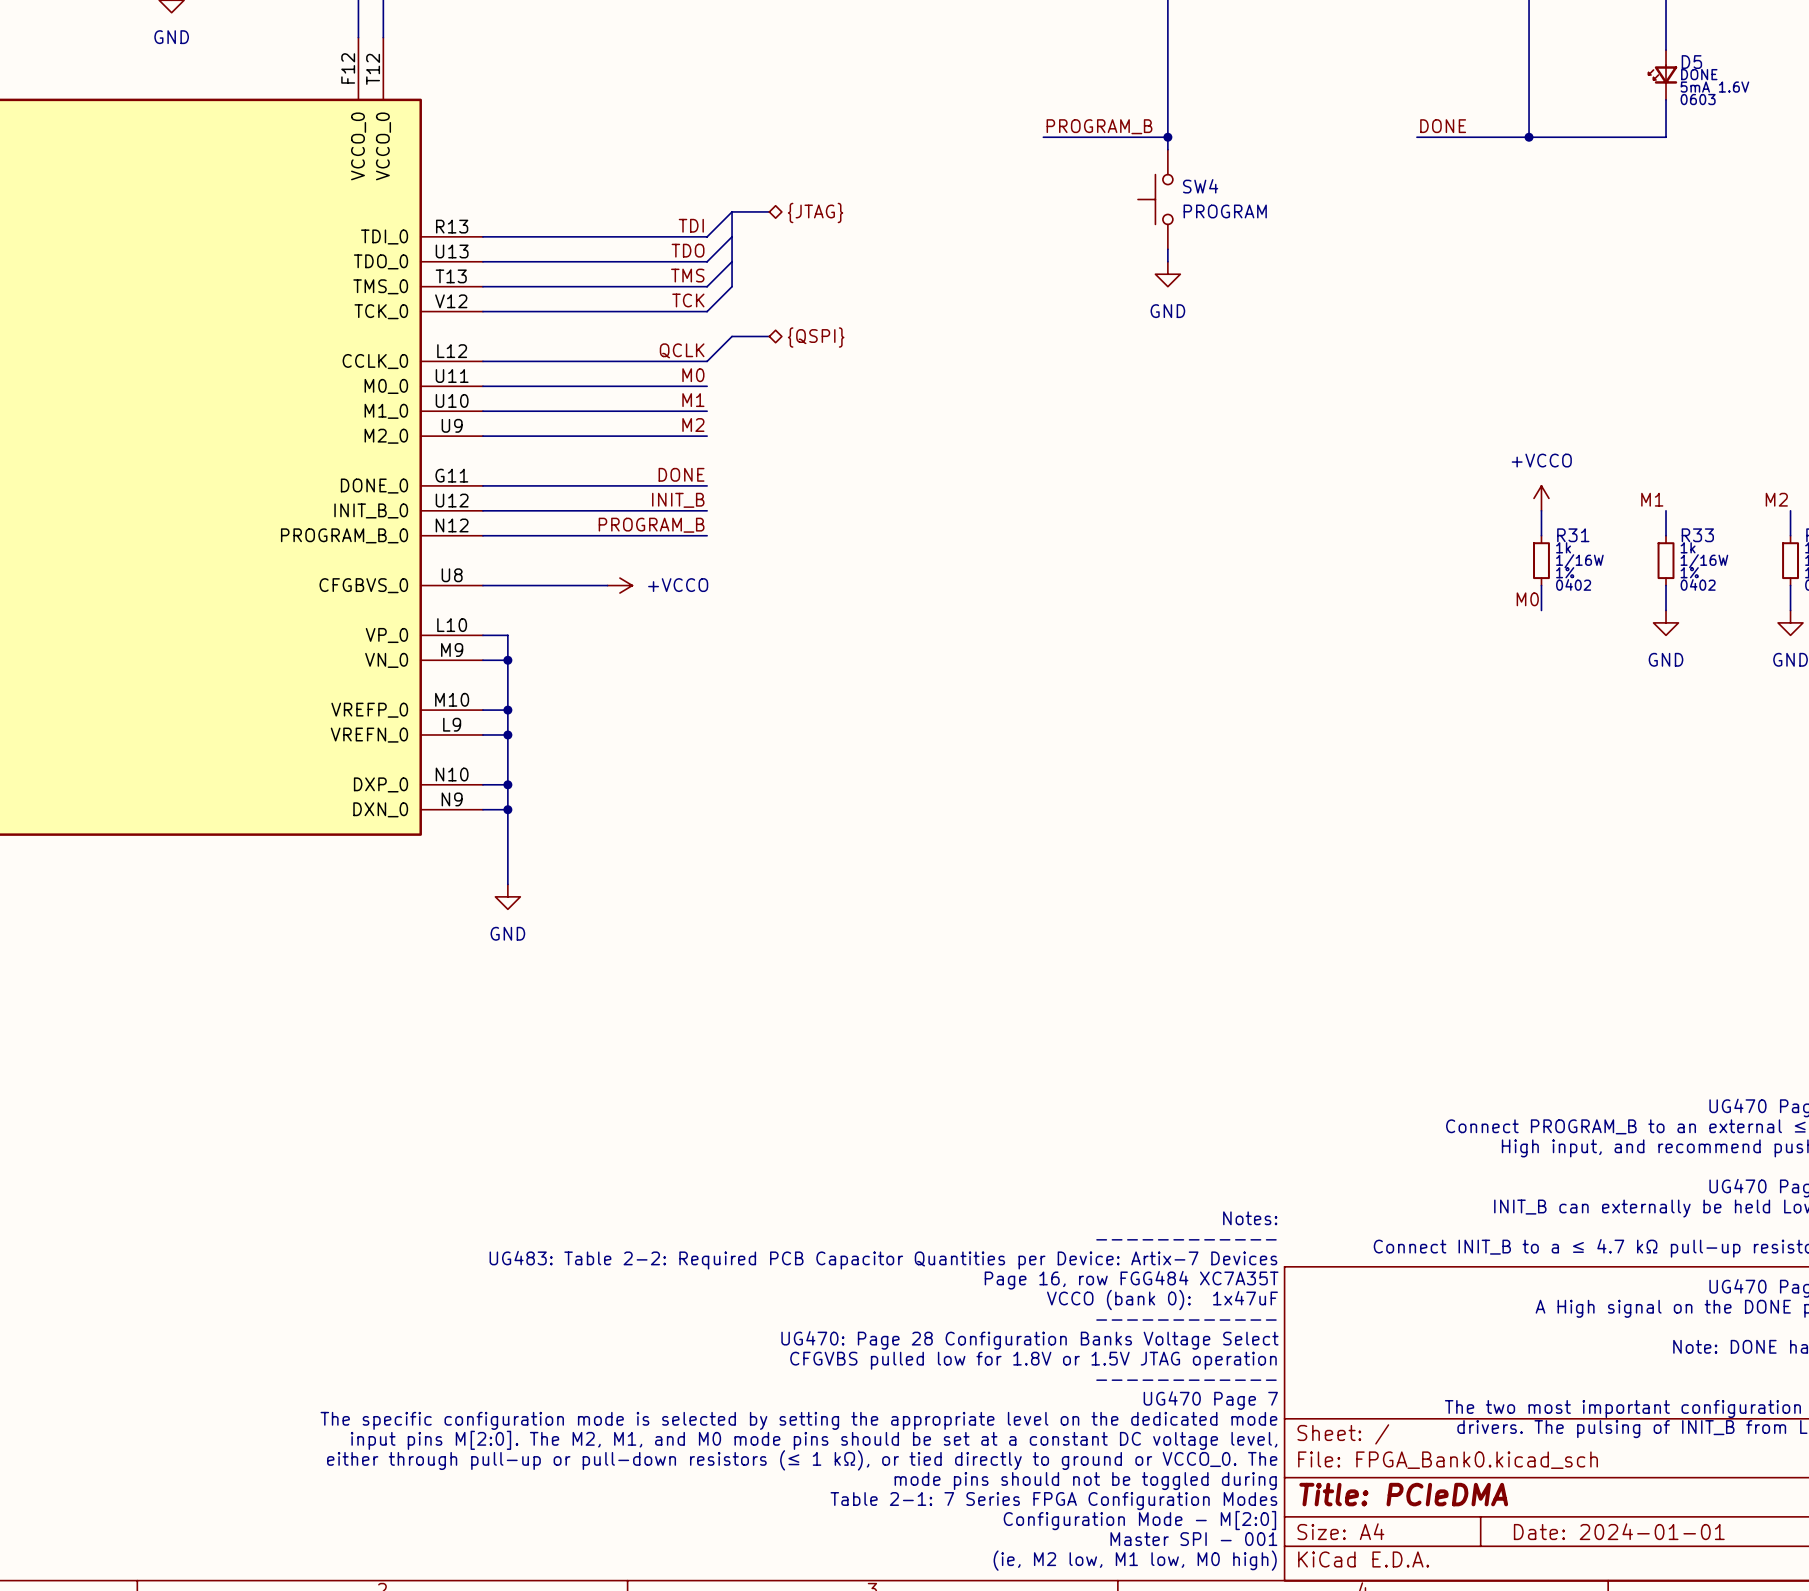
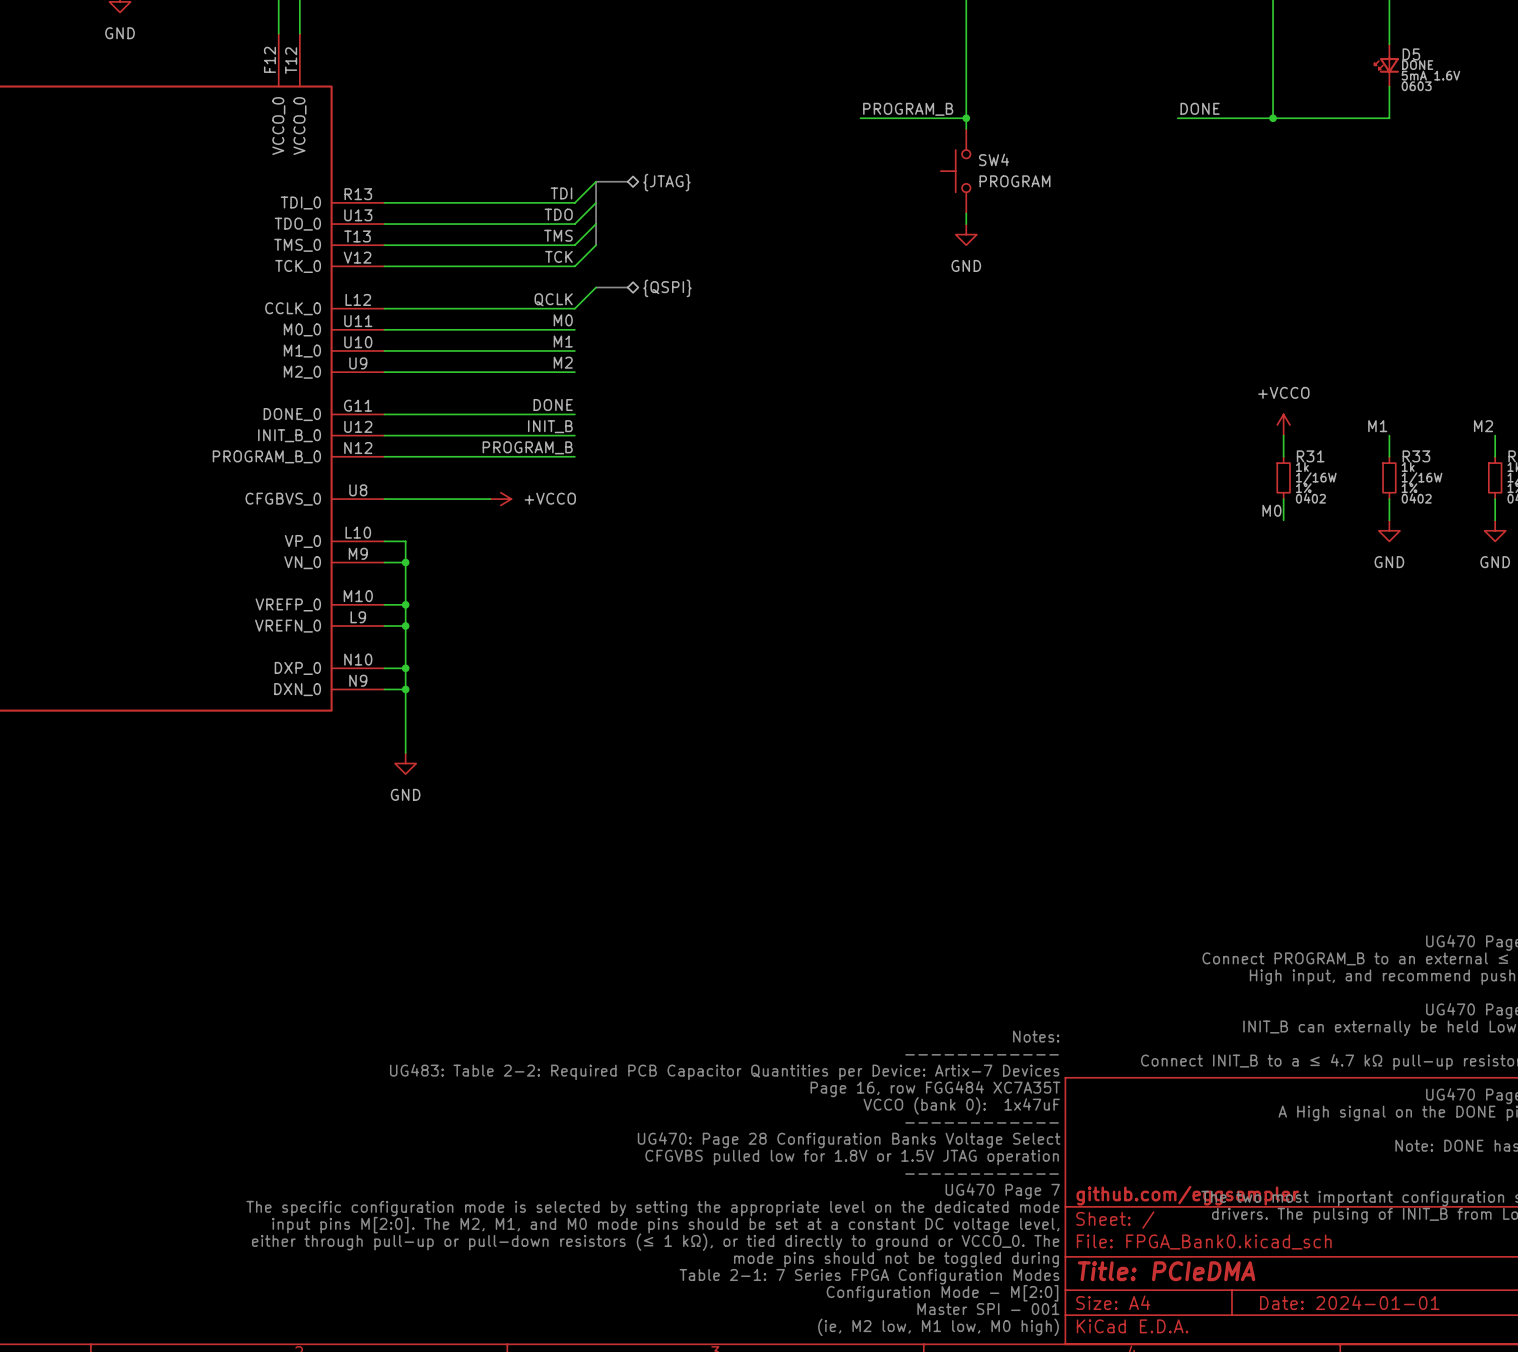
title block: none -> github.com/eggsampler (1187, 1195)

